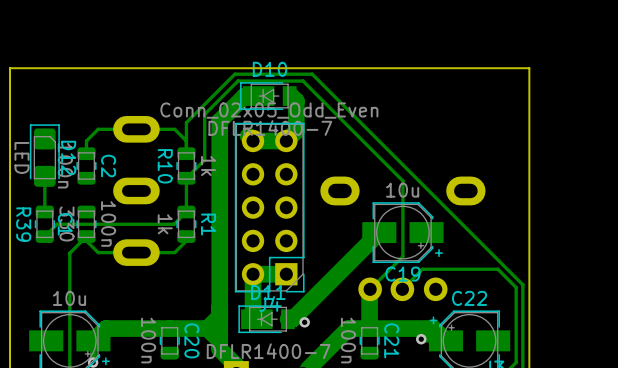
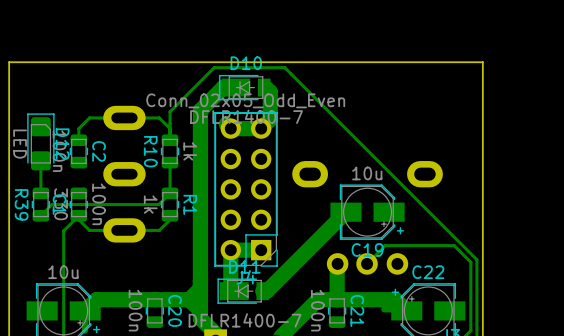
track: (186, 178) (204, 159) (204, 114) (238, 81) (302, 81) (402, 180) (402, 256) (370, 289) -> none
via: (304, 322) -> none
via: (421, 339) -> none
via: (93, 362) -> none

